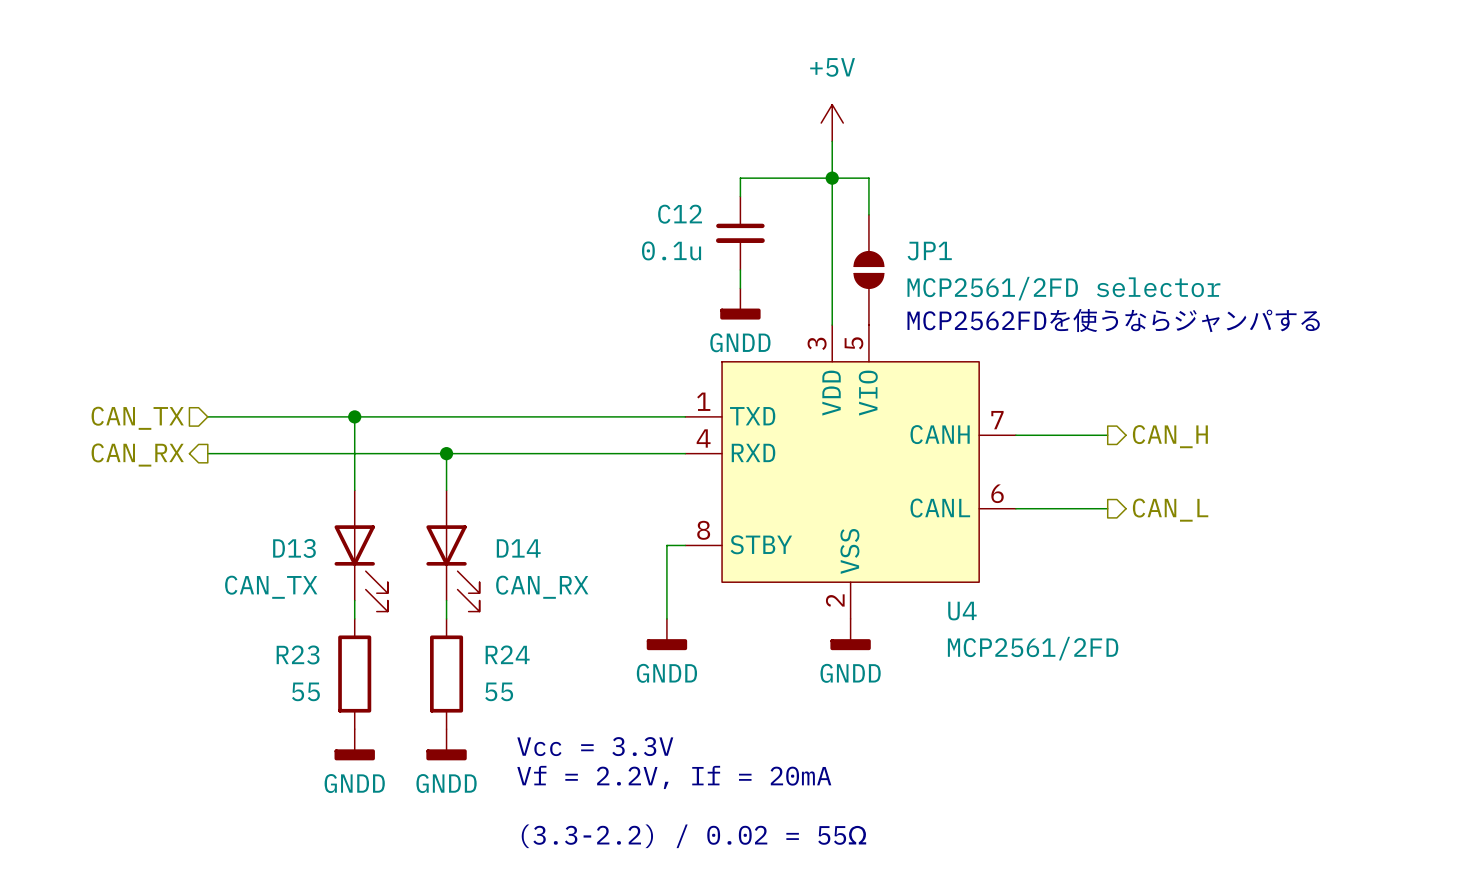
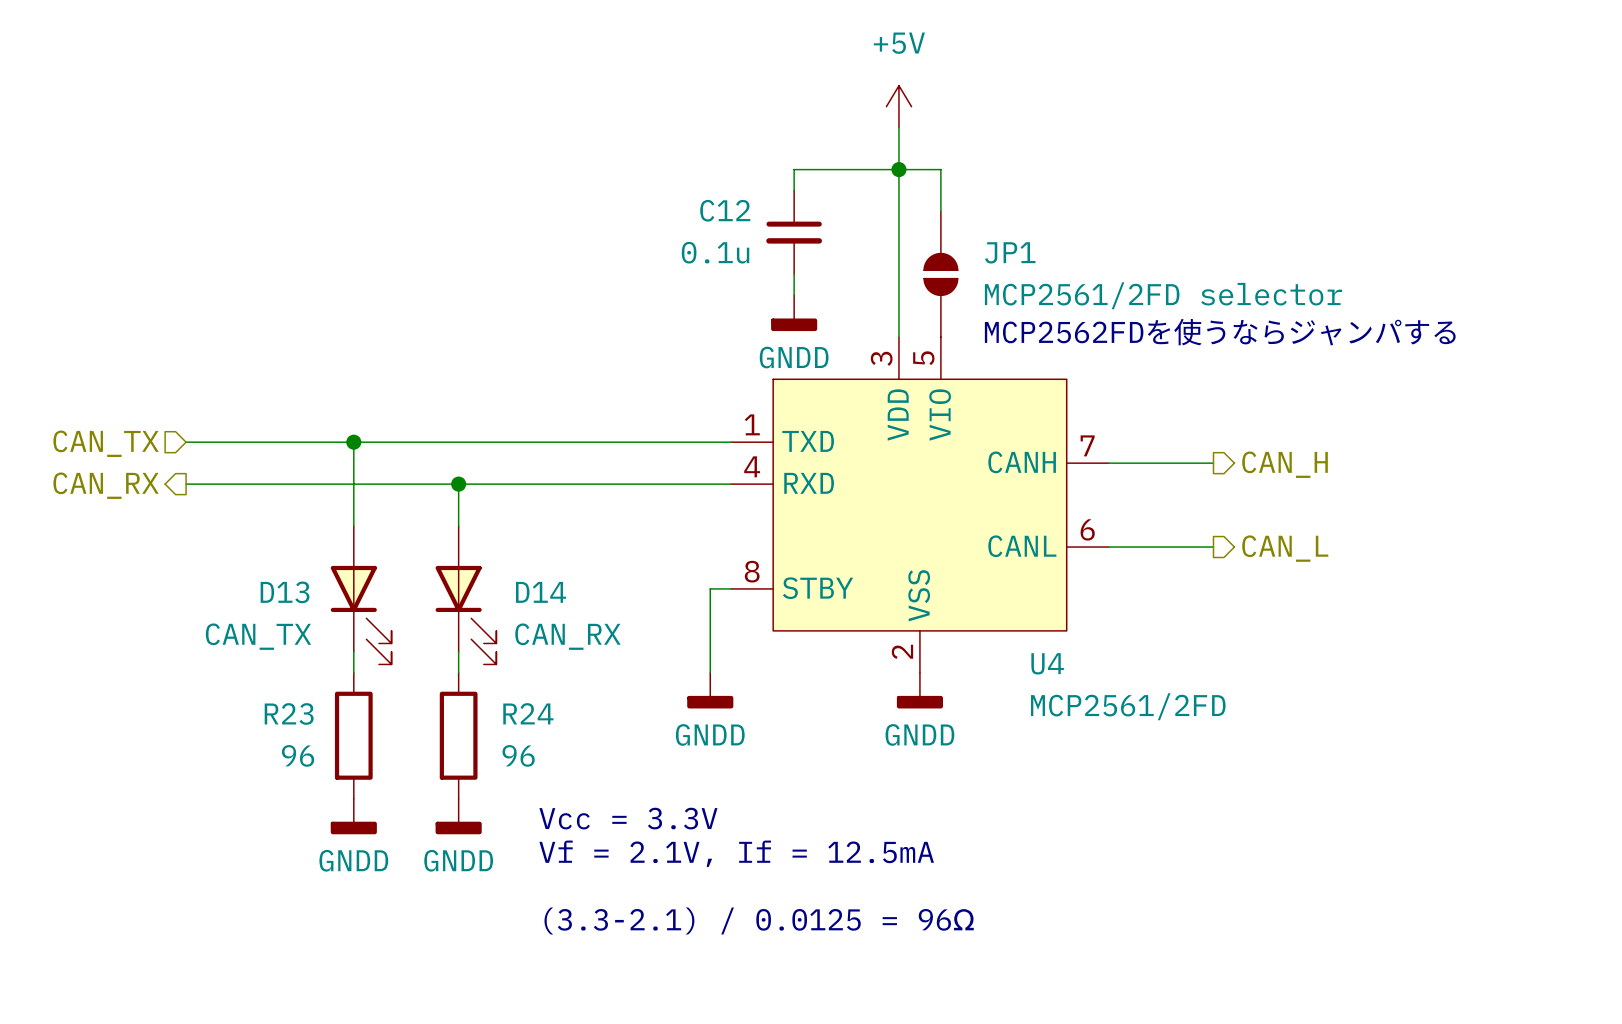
D13 symbol: [334, 490, 388, 612] -> [330, 526, 392, 665]
D14 symbol: [426, 490, 480, 612] -> [435, 526, 497, 665]
R23 value: 55 (305, 691) -> 96 (298, 755)
R24 value: 55 (499, 691) -> 96 (518, 755)
text: Vf = 2.2V, If = 20mA (674, 777) -> Vf = 2.1V, If = 12.5mA (736, 853)
text: (3.3-2.2) / 0.02 = 55Ω (693, 836) -> (3.3-2.1) / 0.0125 = 96Ω (759, 920)

